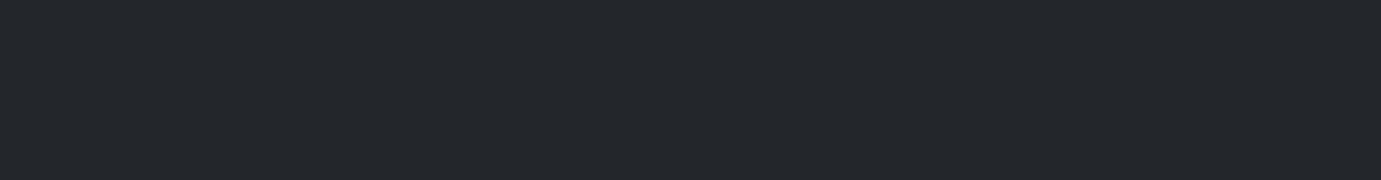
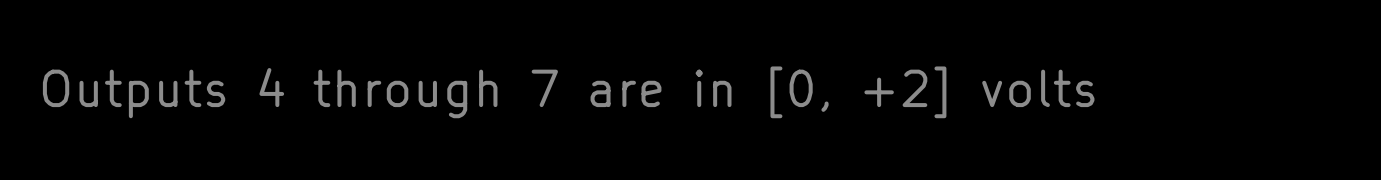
text: none -> Outputs 4 through 7 are in [0, +2] volts (568, 92)

